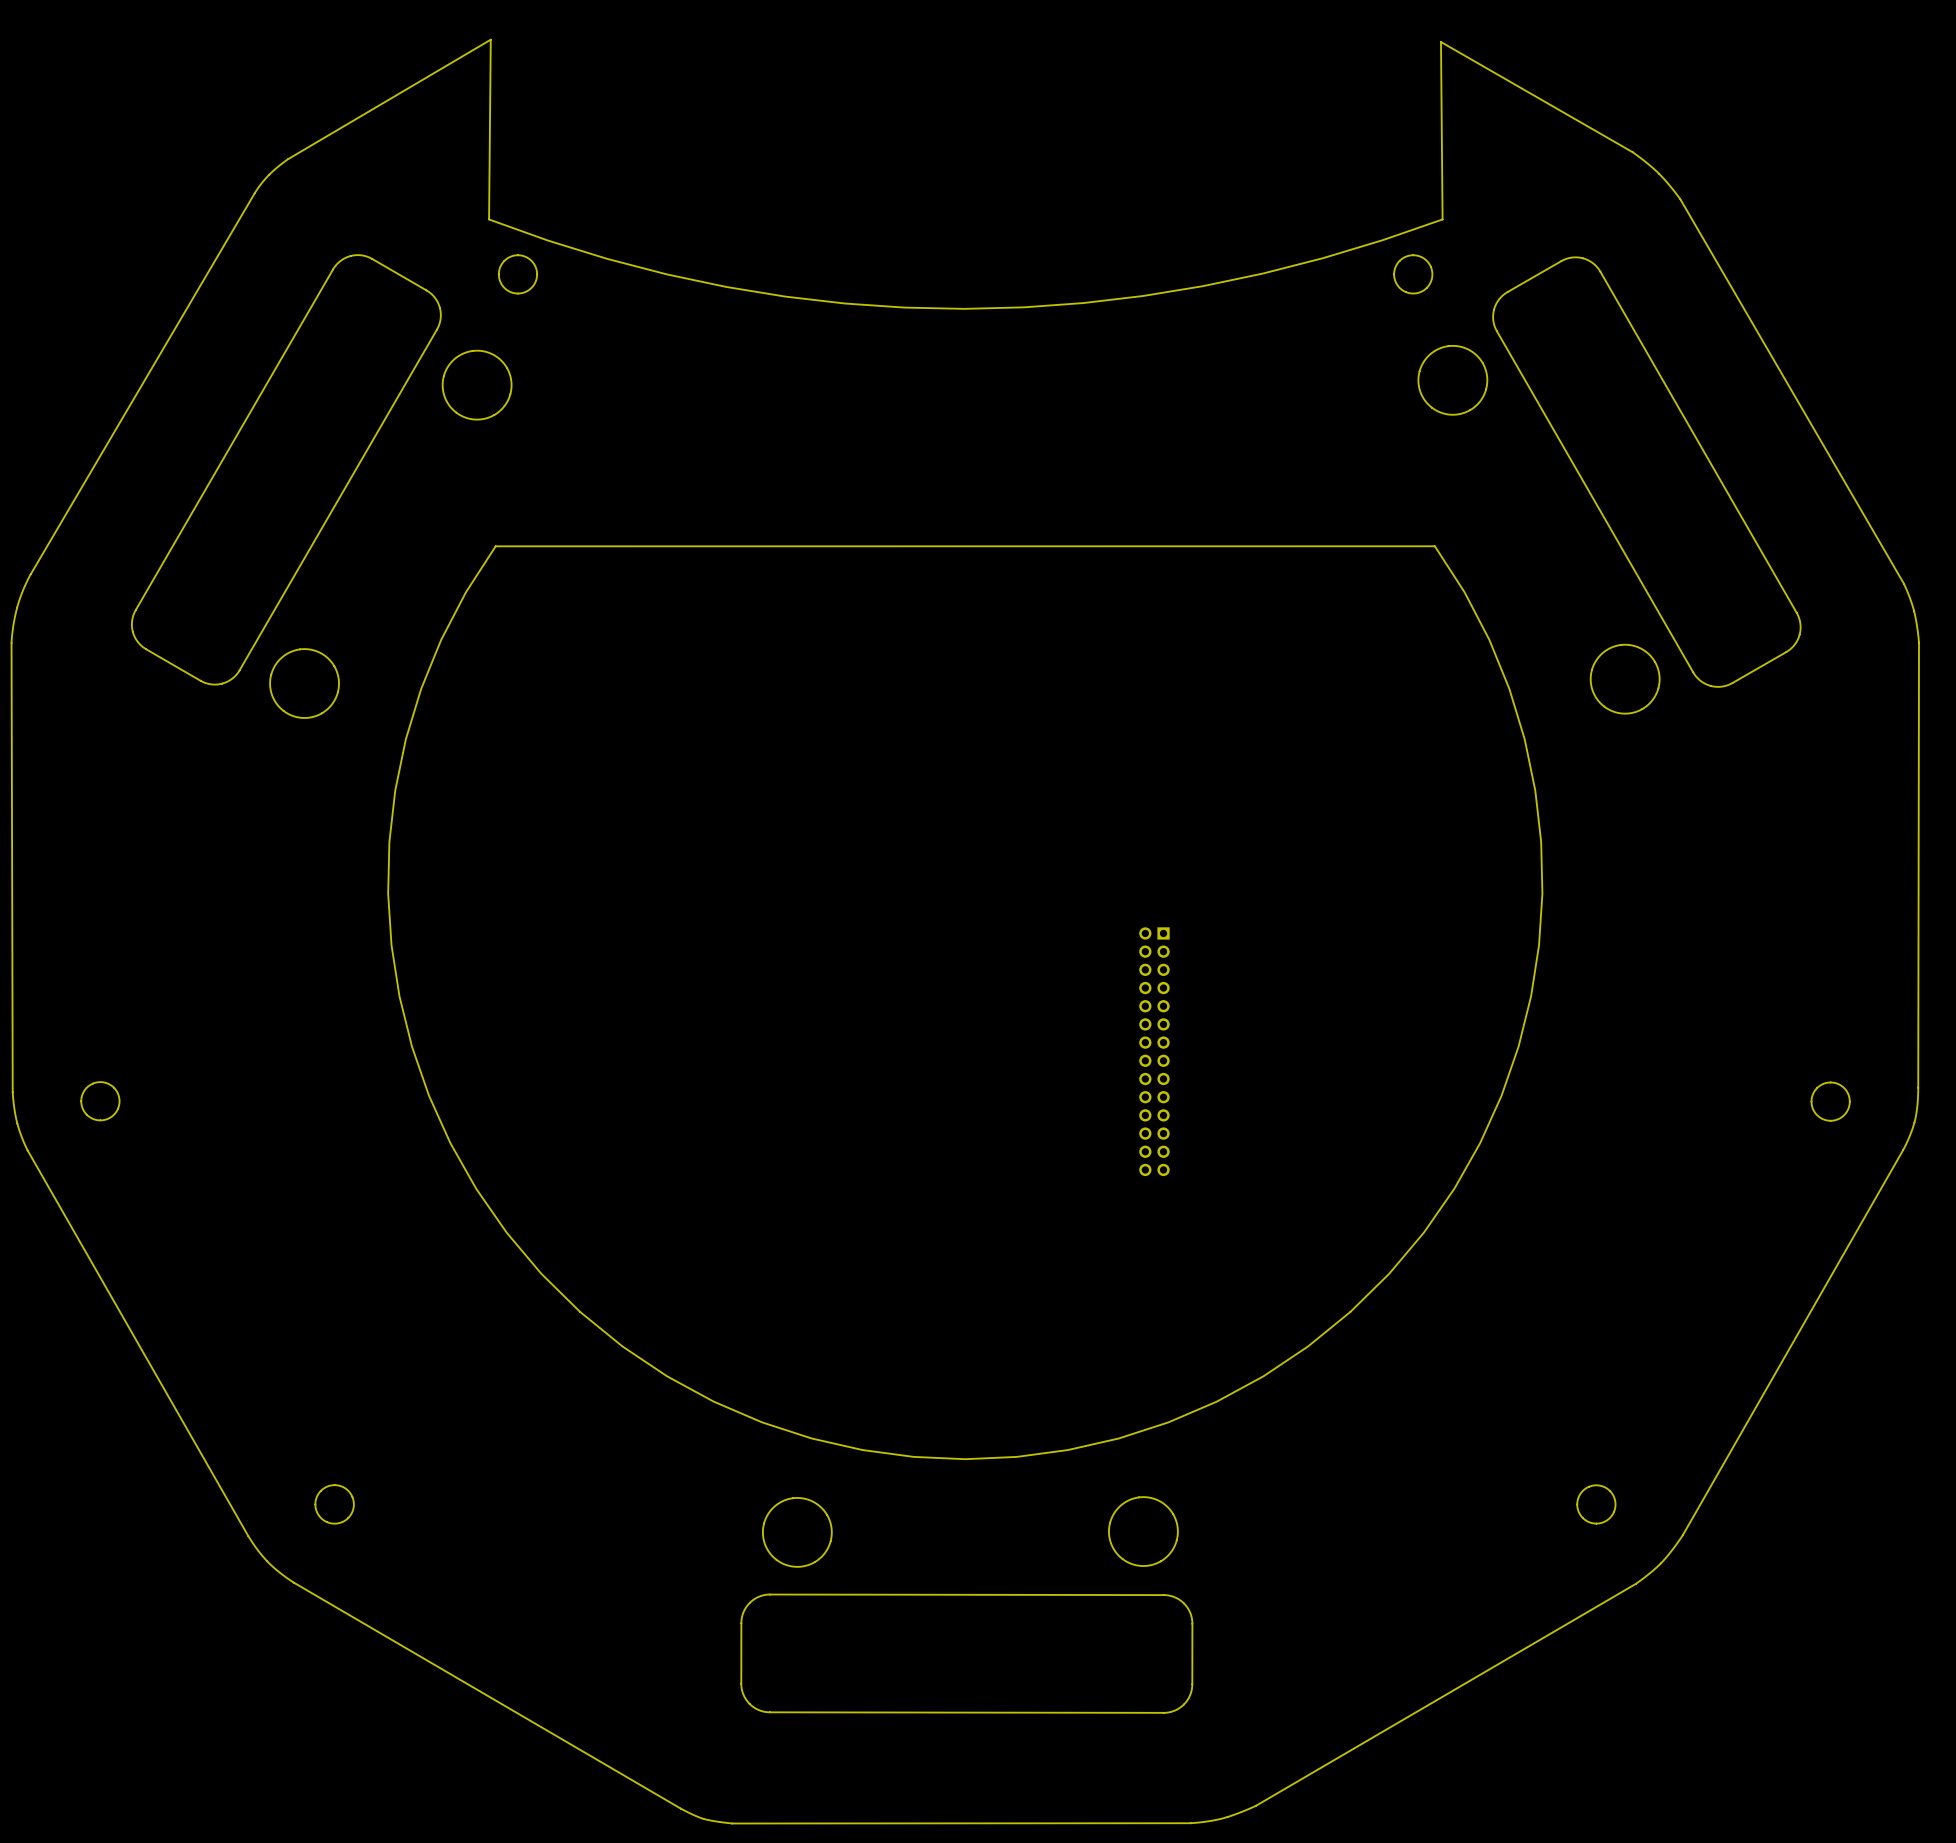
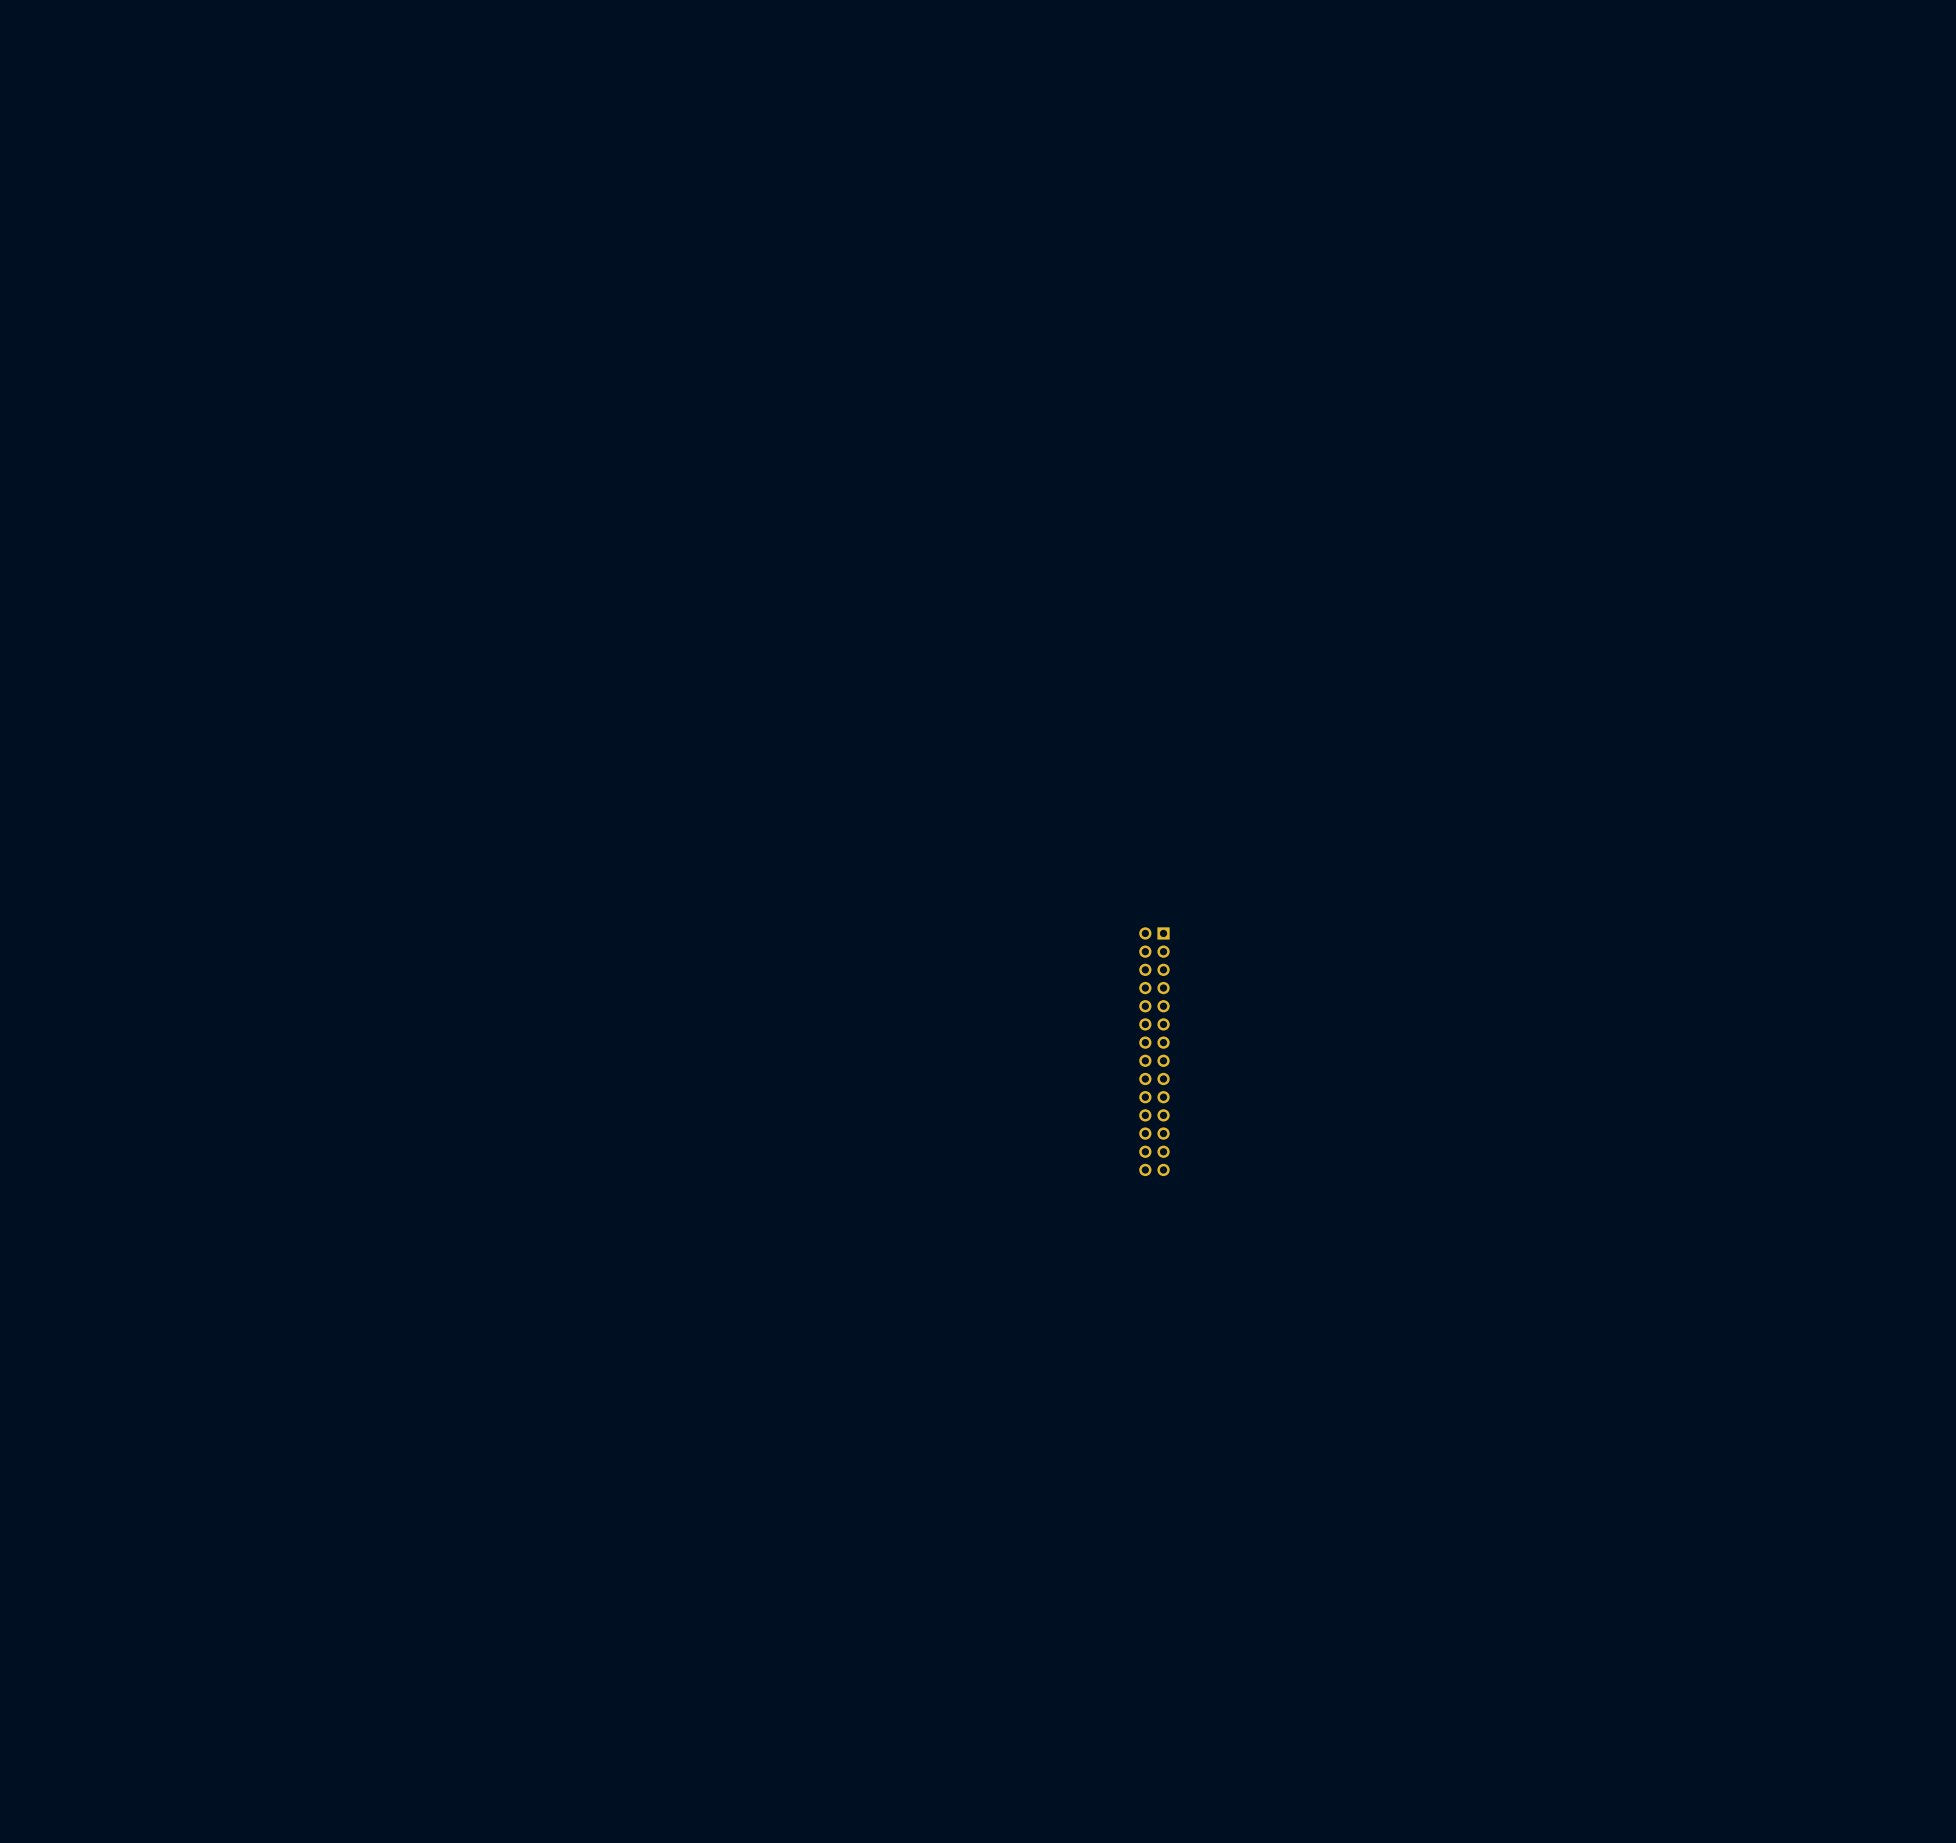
board edge: (490, 39) (489, 219) (607, 258) (726, 286) (844, 303) (964, 308) (1083, 303) (1203, 286) (1322, 258) (1442, 219) (1440, 42) (1632, 152) (1654, 169) (1668, 184) (1680, 199) (1906, 589) (1914, 611) (1919, 642) (1918, 1088) (1915, 1119) (1903, 1149) (1682, 1535) (1660, 1563) (1635, 1583) (1247, 1809) (1221, 1818) (1190, 1823) (732, 1823) (703, 1818) (680, 1808) (293, 1582) (269, 1563) (248, 1535) (23, 1142) (16, 1118) (12, 1092) (11, 643) (15, 614) (23, 588) (254, 193) (264, 179) (288, 159) (490, 39) -> none
board edge: (517, 255) (504, 260) (498, 274) (504, 287) (517, 293) (531, 287) (537, 274) (531, 260) (517, 255) -> none
board edge: (1413, 255) (1420, 256) (1427, 261) (1432, 273) (1430, 282) (1426, 287) (1420, 291) (1412, 293) (1400, 288) (1395, 281) (1394, 274) (1399, 260) (1413, 255) -> none
board edge: (350, 256) (340, 261) (333, 269) (133, 615) (132, 631) (140, 645) (205, 683) (223, 683) (232, 678) (238, 671) (439, 324) (439, 307) (430, 292) (369, 257) (360, 255) (350, 256) -> none
board edge: (1583, 258) (1573, 257) (1563, 259) (1503, 294) (1494, 309) (1494, 326) (1694, 673) (1700, 680) (1709, 685) (1727, 685) (1791, 647) (1799, 634) (1799, 618) (1600, 271) (1593, 263) (1583, 258) -> none
board edge: (1448, 346) (1461, 346) (1474, 353) (1482, 363) (1487, 375) (1486, 389) (1480, 401) (1470, 410) (1458, 414) (1443, 413) (1431, 407) (1423, 398) (1418, 384) (1419, 371) (1425, 359) (1436, 350) (1448, 346) -> none
board edge: (472, 350) (460, 354) (449, 364) (443, 376) (442, 388) (447, 403) (456, 412) (467, 418) (482, 419) (494, 414) (504, 406) (510, 394) (511, 380) (506, 367) (498, 358) (485, 351) (472, 350) -> none
board edge: (1434, 546) (495, 546) (466, 592) (441, 639) (421, 689) (405, 739) (395, 790) (389, 842) (388, 893) (391, 945) (399, 996) (411, 1046) (428, 1095) (450, 1143) (476, 1188) (506, 1232) (541, 1273) (580, 1311) (622, 1346) (667, 1376) (713, 1401) (762, 1422) (811, 1438) (862, 1450) (913, 1456) (965, 1459) (1016, 1456) (1068, 1449) (1118, 1438) (1168, 1422) (1216, 1401) (1263, 1376) (1308, 1346) (1350, 1311) (1389, 1273) (1424, 1232) (1454, 1188) (1480, 1143) (1501, 1095) (1518, 1046) (1531, 996) (1539, 945) (1542, 893) (1541, 841) (1535, 790) (1524, 739) (1509, 689) (1489, 639) (1464, 592) (1434, 546) -> none
board edge: (1620, 645) (1633, 645) (1646, 652) (1655, 661) (1659, 674) (1658, 688) (1652, 700) (1642, 709) (1630, 713) (1615, 712) (1604, 706) (1595, 697) (1590, 682) (1591, 670) (1597, 658) (1608, 648) (1620, 645) -> none
board edge: (300, 649) (312, 650) (326, 656) (334, 666) (338, 679) (337, 692) (331, 704) (321, 713) (309, 717) (294, 716) (283, 710) (275, 701) (270, 687) (271, 674) (276, 663) (287, 653) (300, 649) -> none
board edge: (1830, 1082) (1844, 1088) (1849, 1101) (1844, 1115) (1830, 1120) (1817, 1115) (1811, 1101) (1817, 1088) (1830, 1082) -> none
board edge: (93, 1083) (87, 1087) (82, 1094) (82, 1108) (93, 1118) (107, 1119) (114, 1114) (118, 1108) (119, 1101) (117, 1093) (108, 1083) (99, 1082) (93, 1083) -> none
board edge: (334, 1485) (321, 1490) (315, 1504) (316, 1511) (321, 1518) (334, 1523) (342, 1522) (348, 1518) (352, 1512) (353, 1503) (348, 1491) (341, 1486) (334, 1485) -> none
board edge: (1589, 1486) (1583, 1490) (1578, 1497) (1578, 1511) (1589, 1522) (1603, 1522) (1610, 1517) (1614, 1511) (1615, 1504) (1613, 1496) (1604, 1486) (1595, 1485) (1589, 1486) -> none
board edge: (1138, 1497) (1151, 1498) (1165, 1504) (1173, 1514) (1177, 1527) (1176, 1540) (1170, 1552) (1160, 1561) (1148, 1565) (1133, 1564) (1122, 1558) (1113, 1549) (1109, 1535) (1110, 1522) (1115, 1511) (1126, 1501) (1138, 1497) -> none
board edge: (792, 1498) (780, 1502) (769, 1512) (764, 1523) (763, 1536) (767, 1550) (776, 1559) (787, 1565) (802, 1566) (814, 1562) (824, 1553) (830, 1541) (831, 1527) (827, 1515) (818, 1505) (805, 1498) (792, 1498) -> none
board edge: (770, 1594) (1170, 1595) (1184, 1603) (1191, 1618) (1191, 1691) (1181, 1706) (1165, 1712) (762, 1711) (749, 1703) (742, 1690) (741, 1621) (744, 1610) (750, 1601) (760, 1596) (770, 1594) -> none

